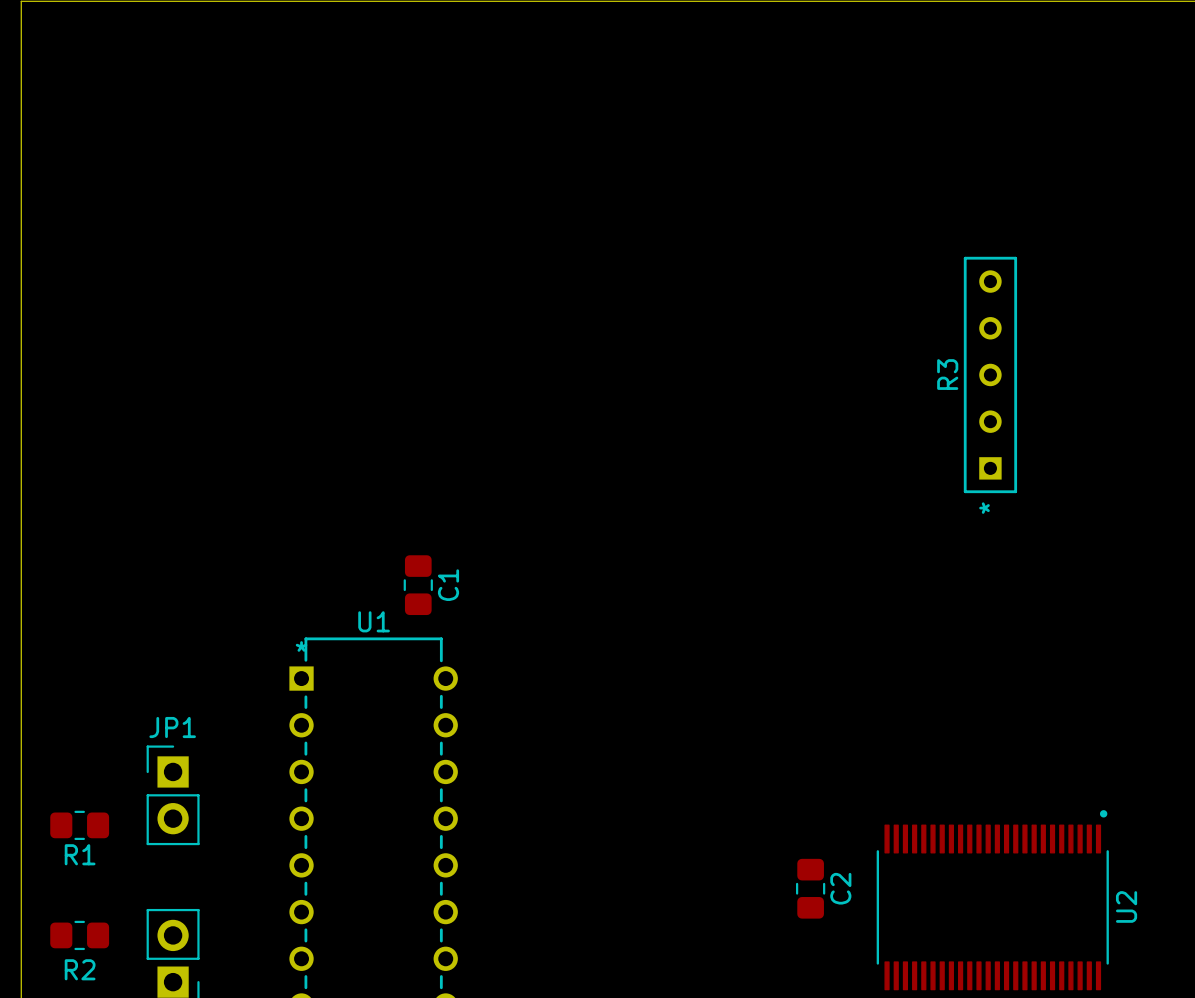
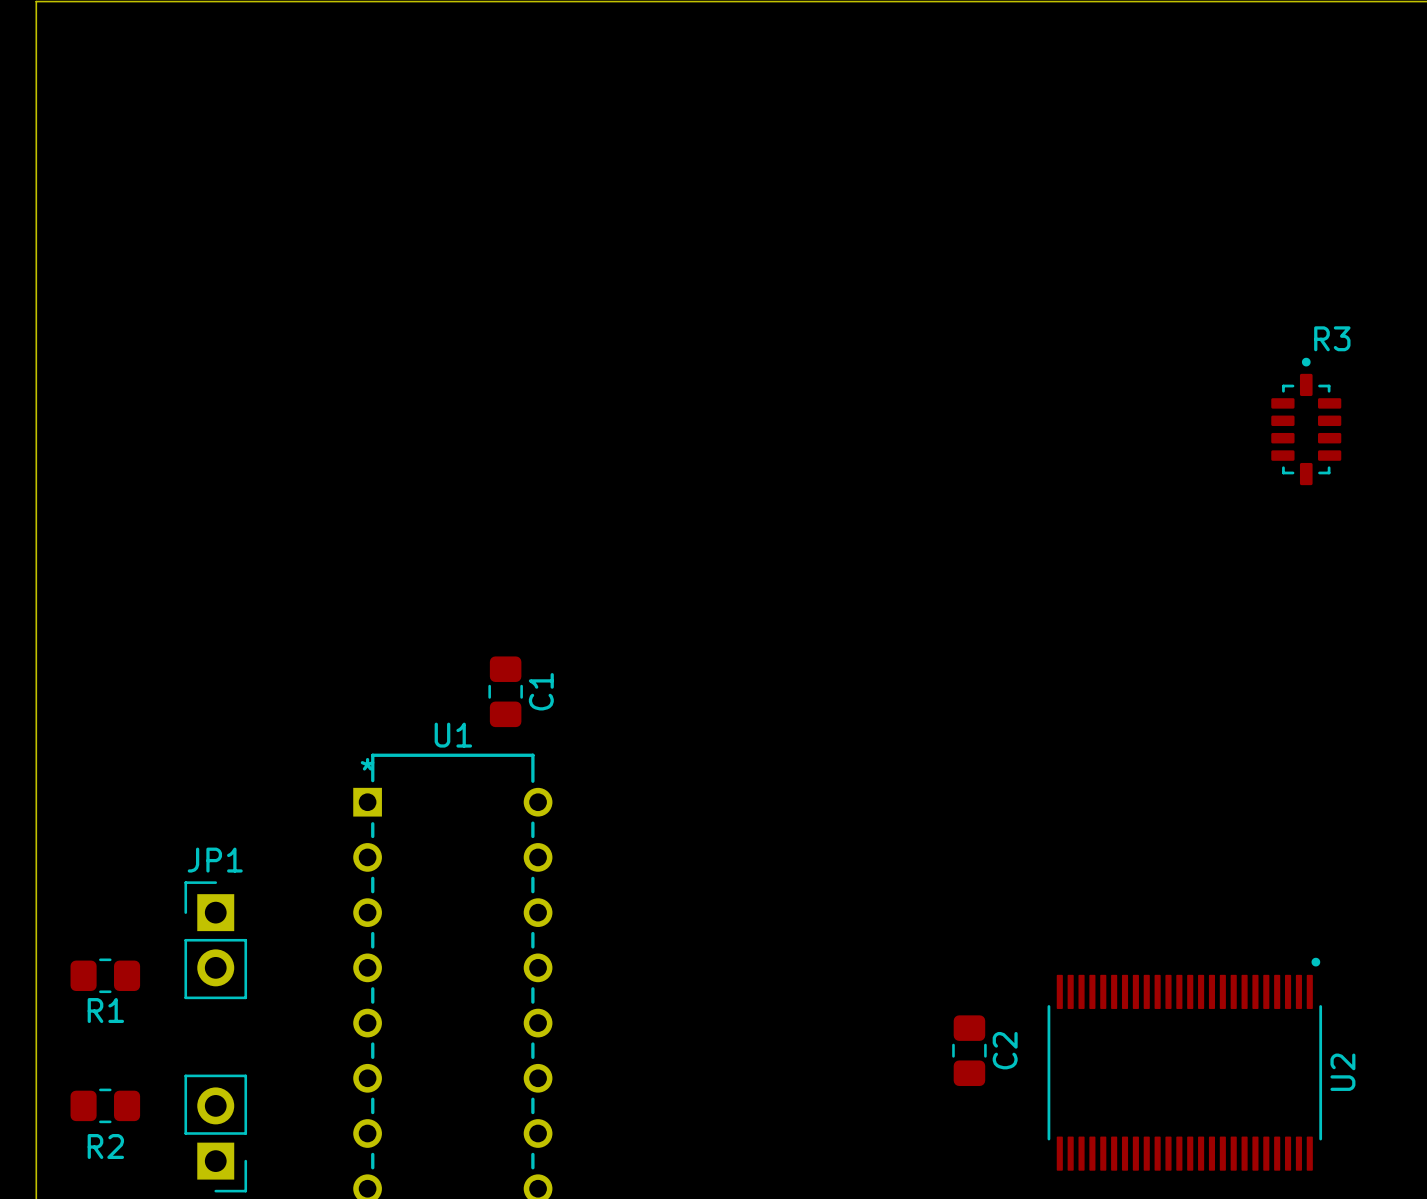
R3 footprint: [963, 256, 1018, 494] -> [1271, 357, 1342, 486]
R3 name position: R3 (947, 374) -> R3 (1332, 338)

